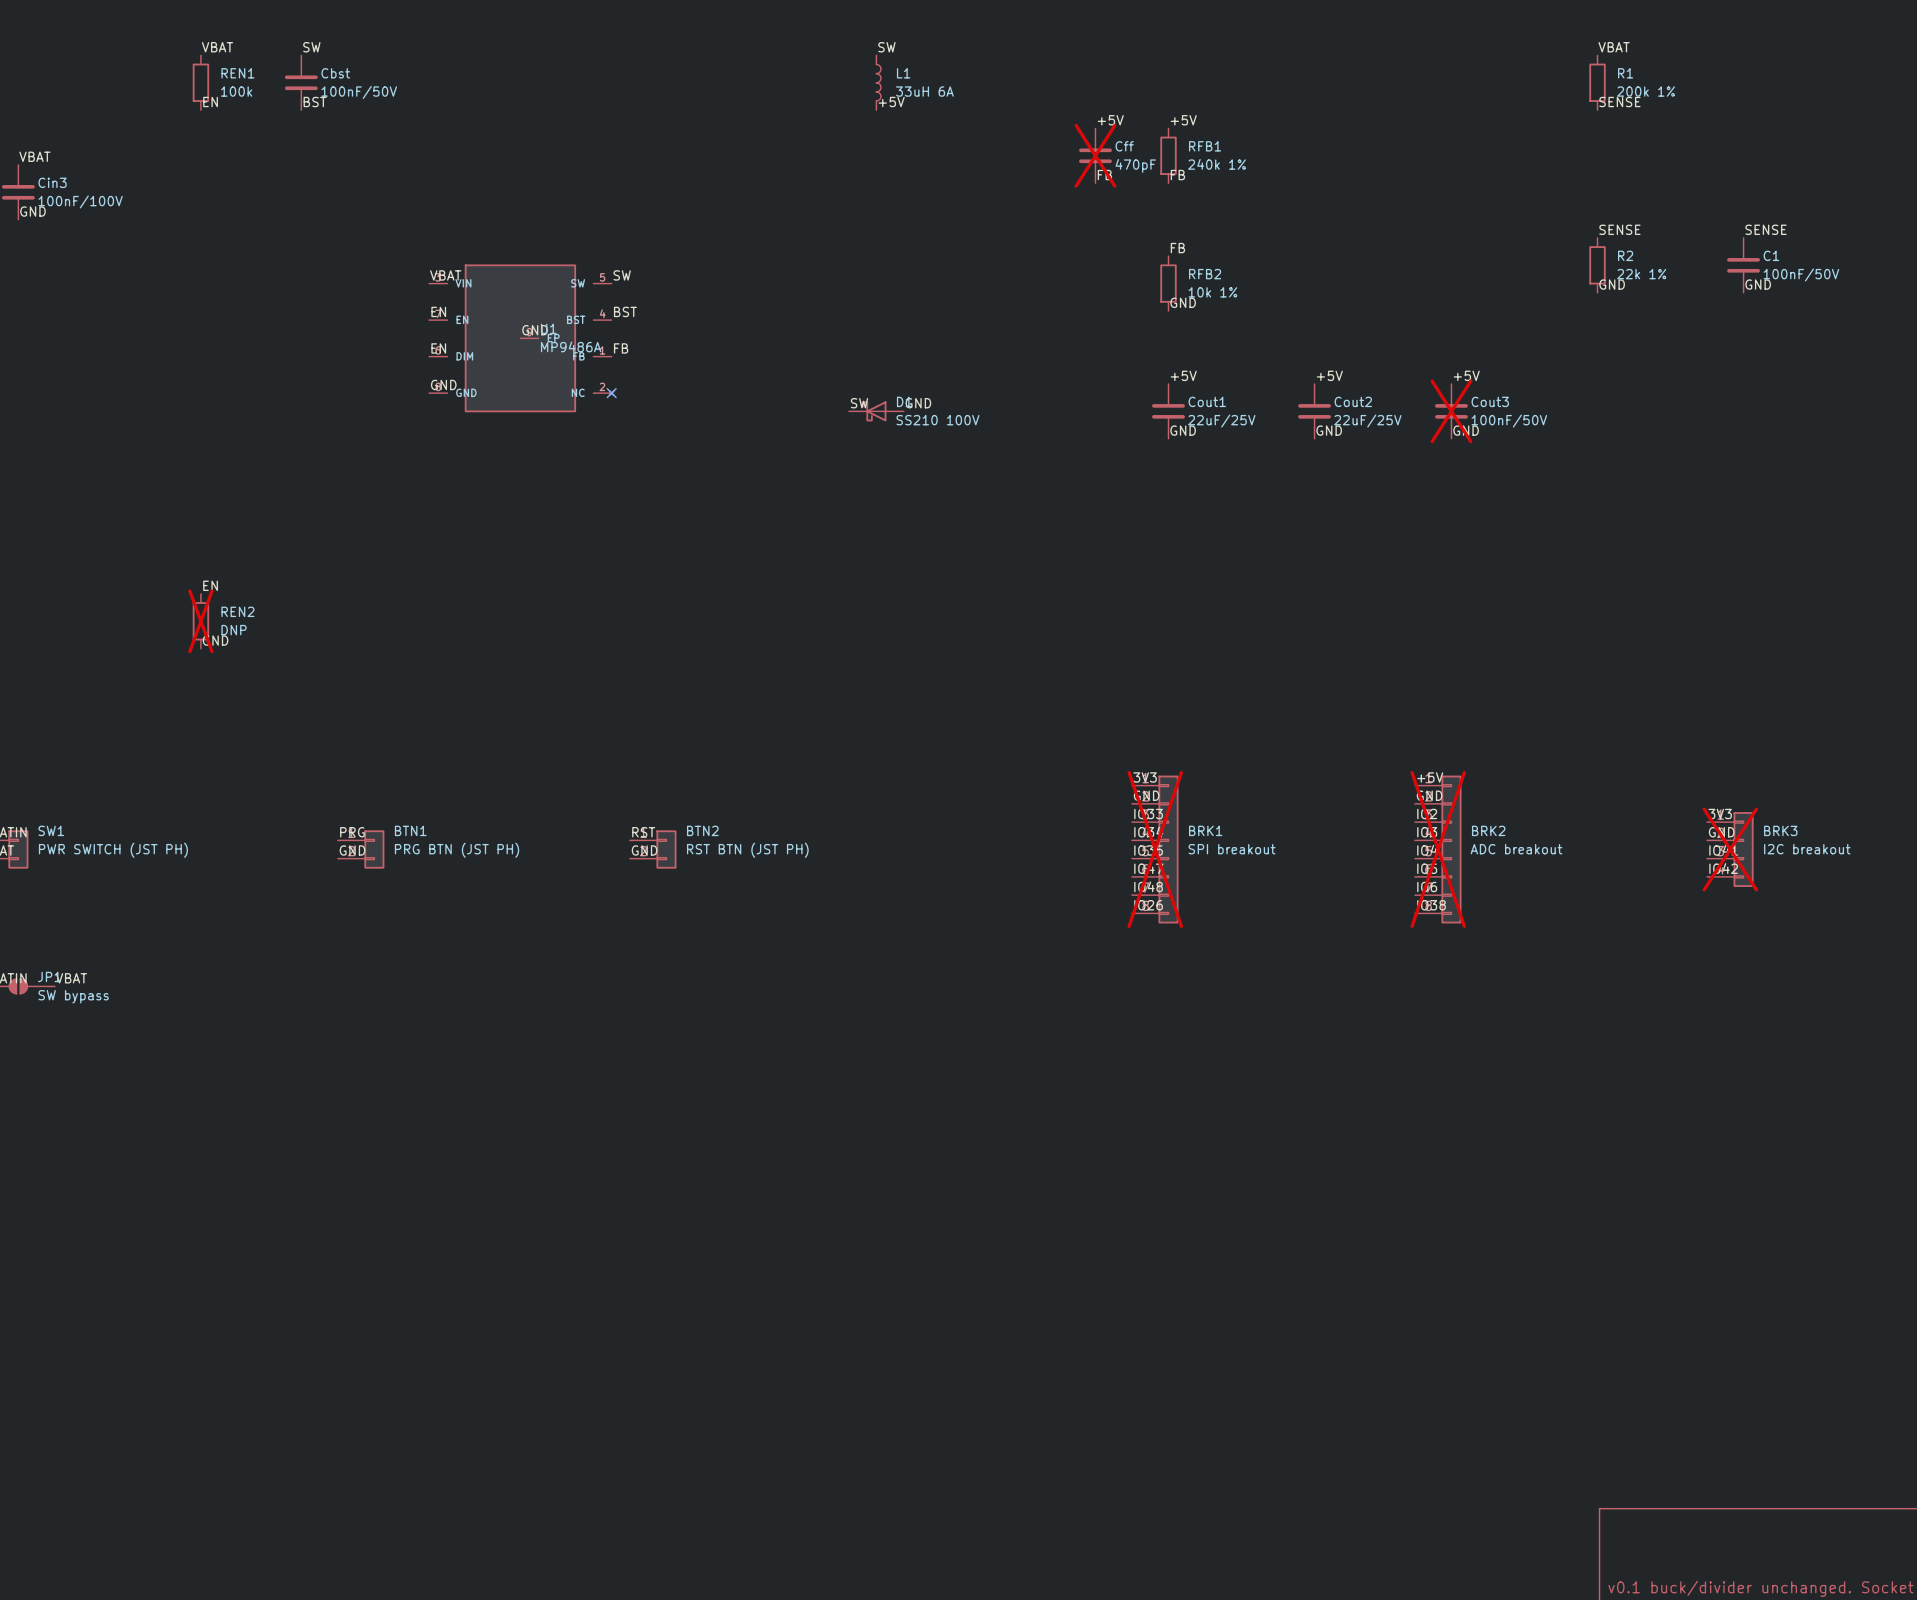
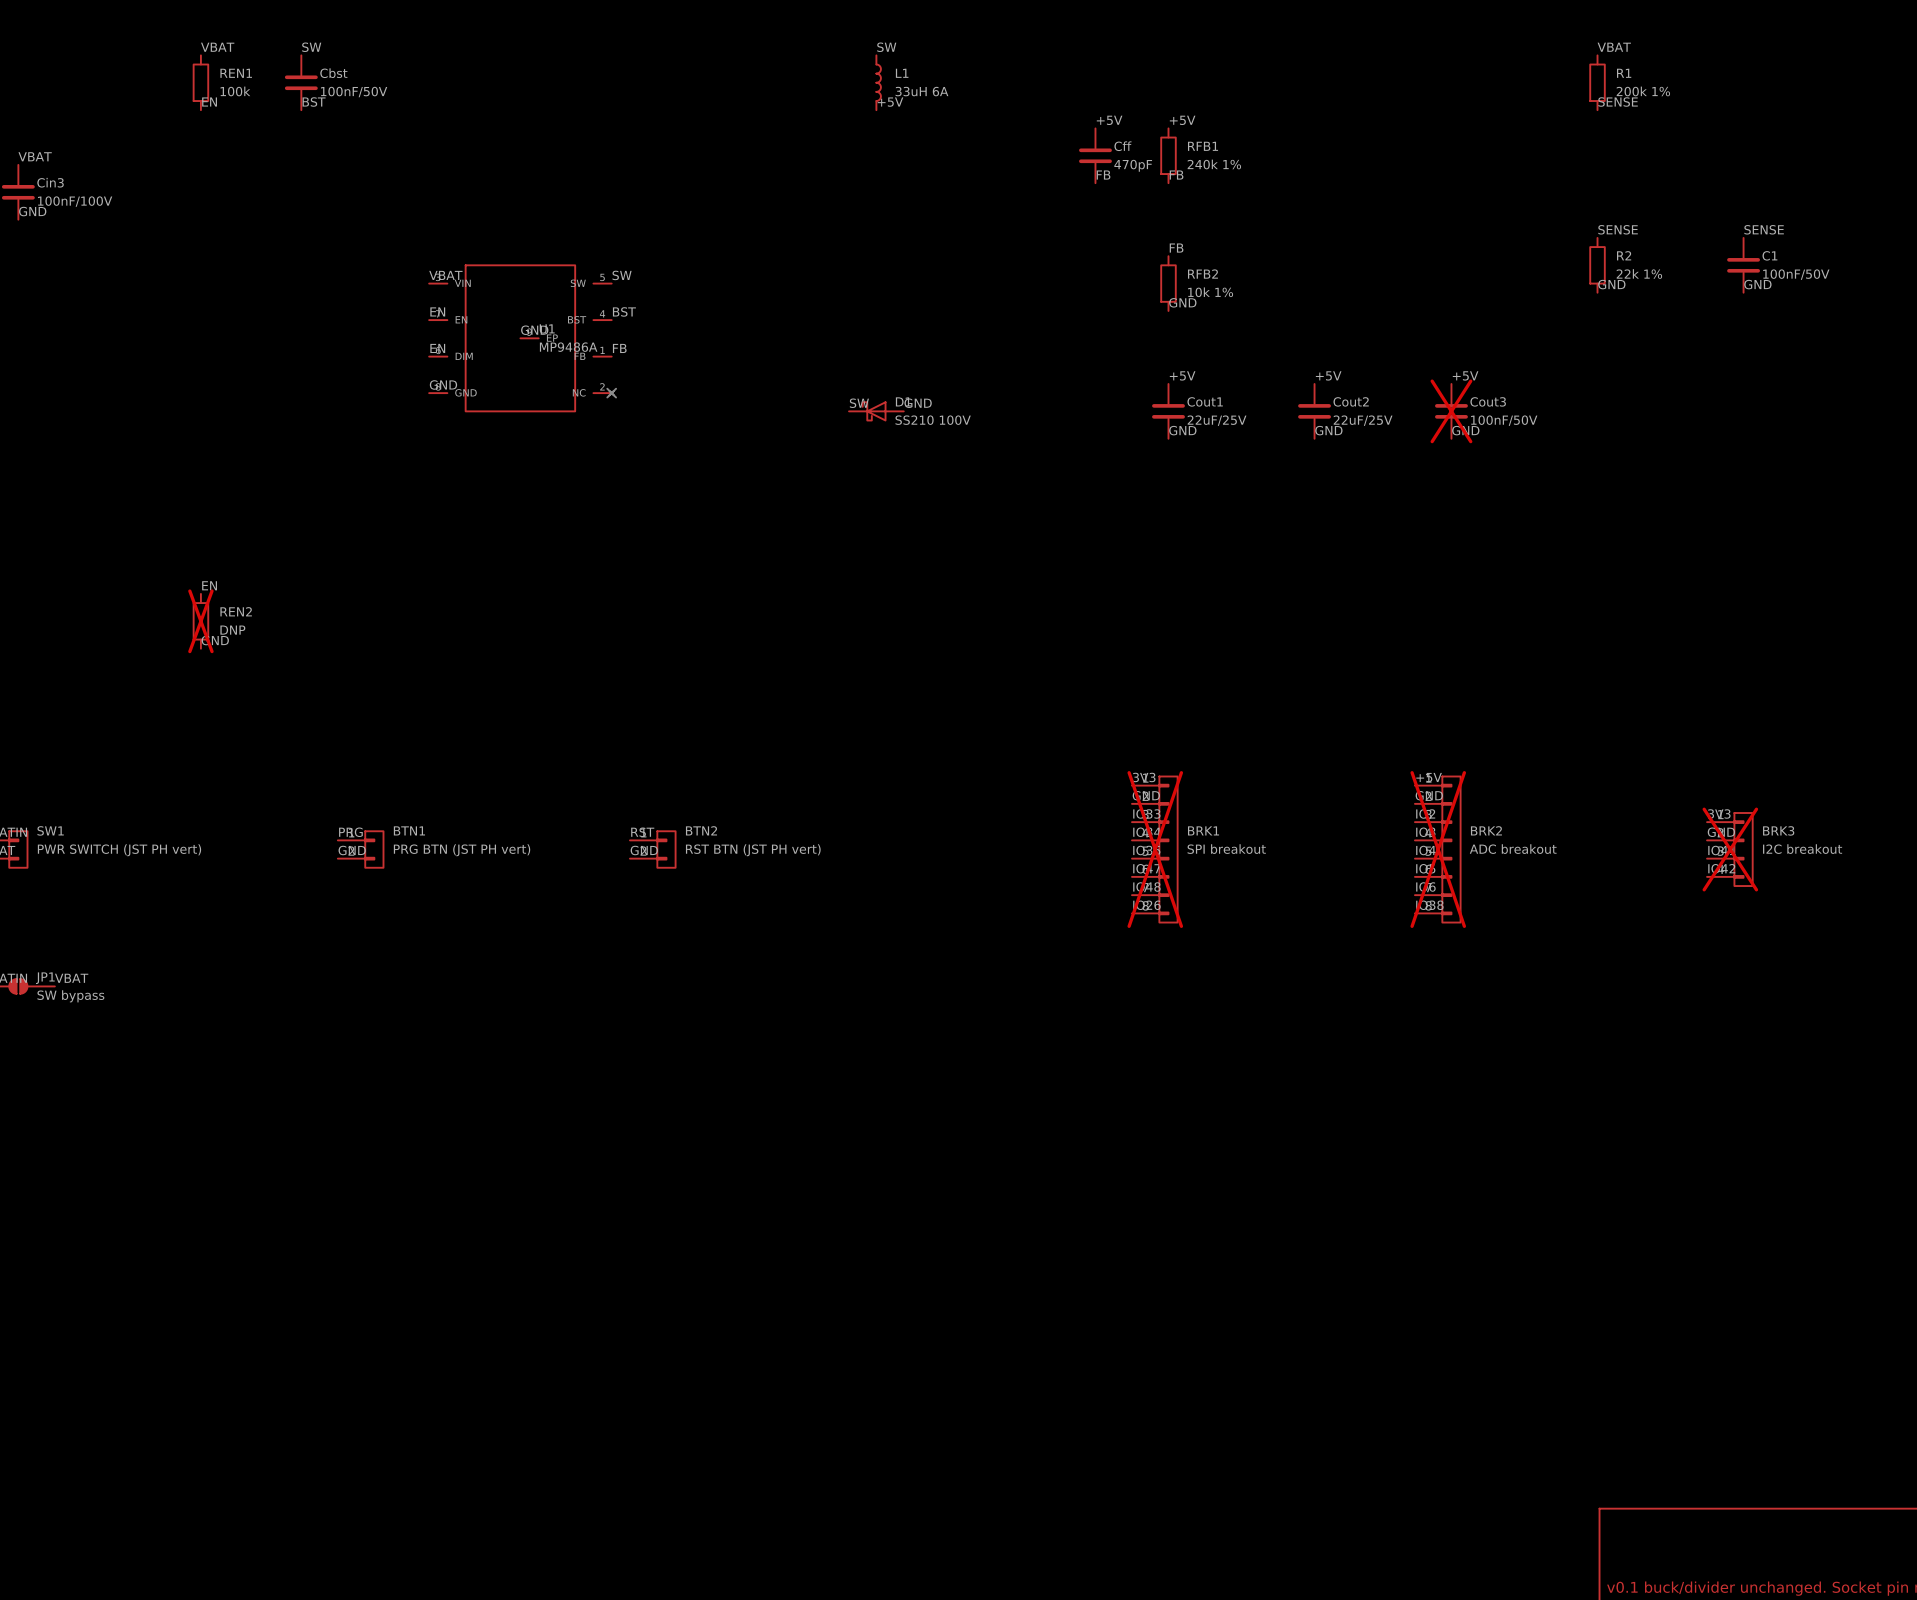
Cff do-not-place cross: (1095, 155) -> none
SW1 value: PWR SWITCH (JST PH) (113, 850) -> PWR SWITCH (JST PH vert) (119, 850)
BTN1 value: PRG BTN (JST PH) (457, 850) -> PRG BTN (JST PH vert) (462, 850)
BTN2 value: RST BTN (JST PH) (747, 850) -> RST BTN (JST PH vert) (753, 850)

